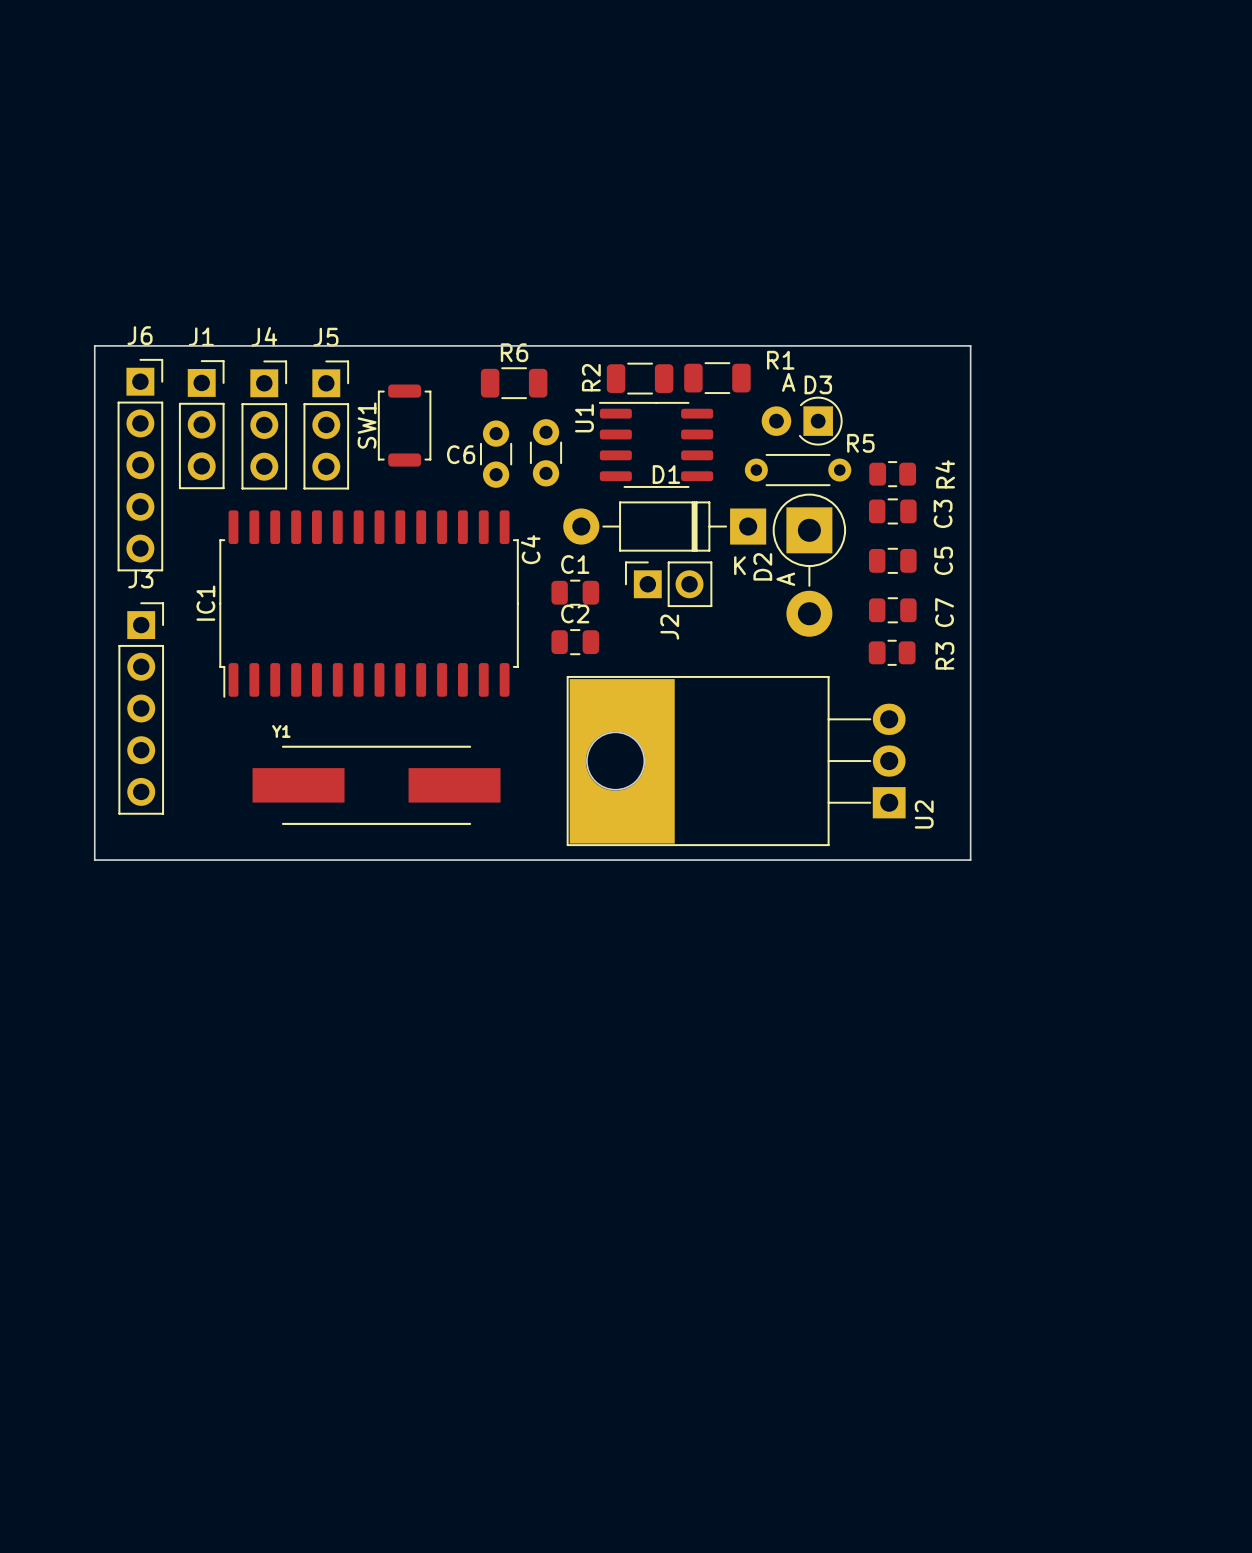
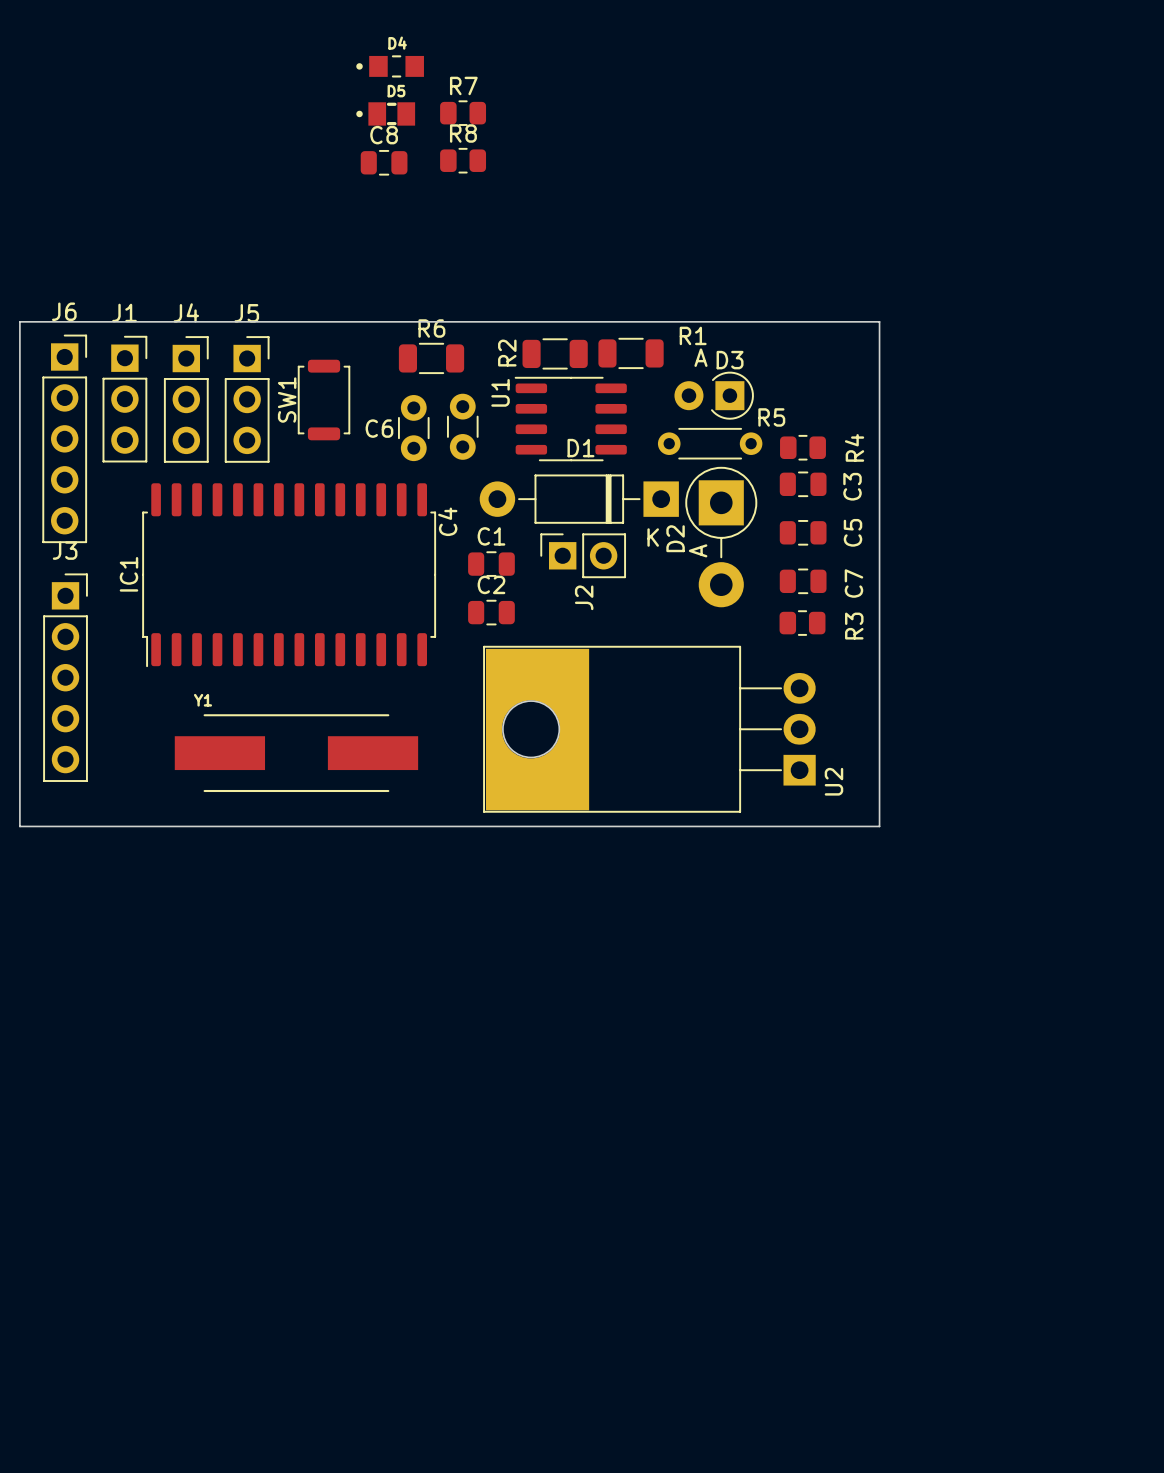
D4: none -> (390, 66)
R7: none -> (463, 113)
D5: none -> (385, 113)
R8: none -> (463, 160)
C8: none -> (384, 162)

